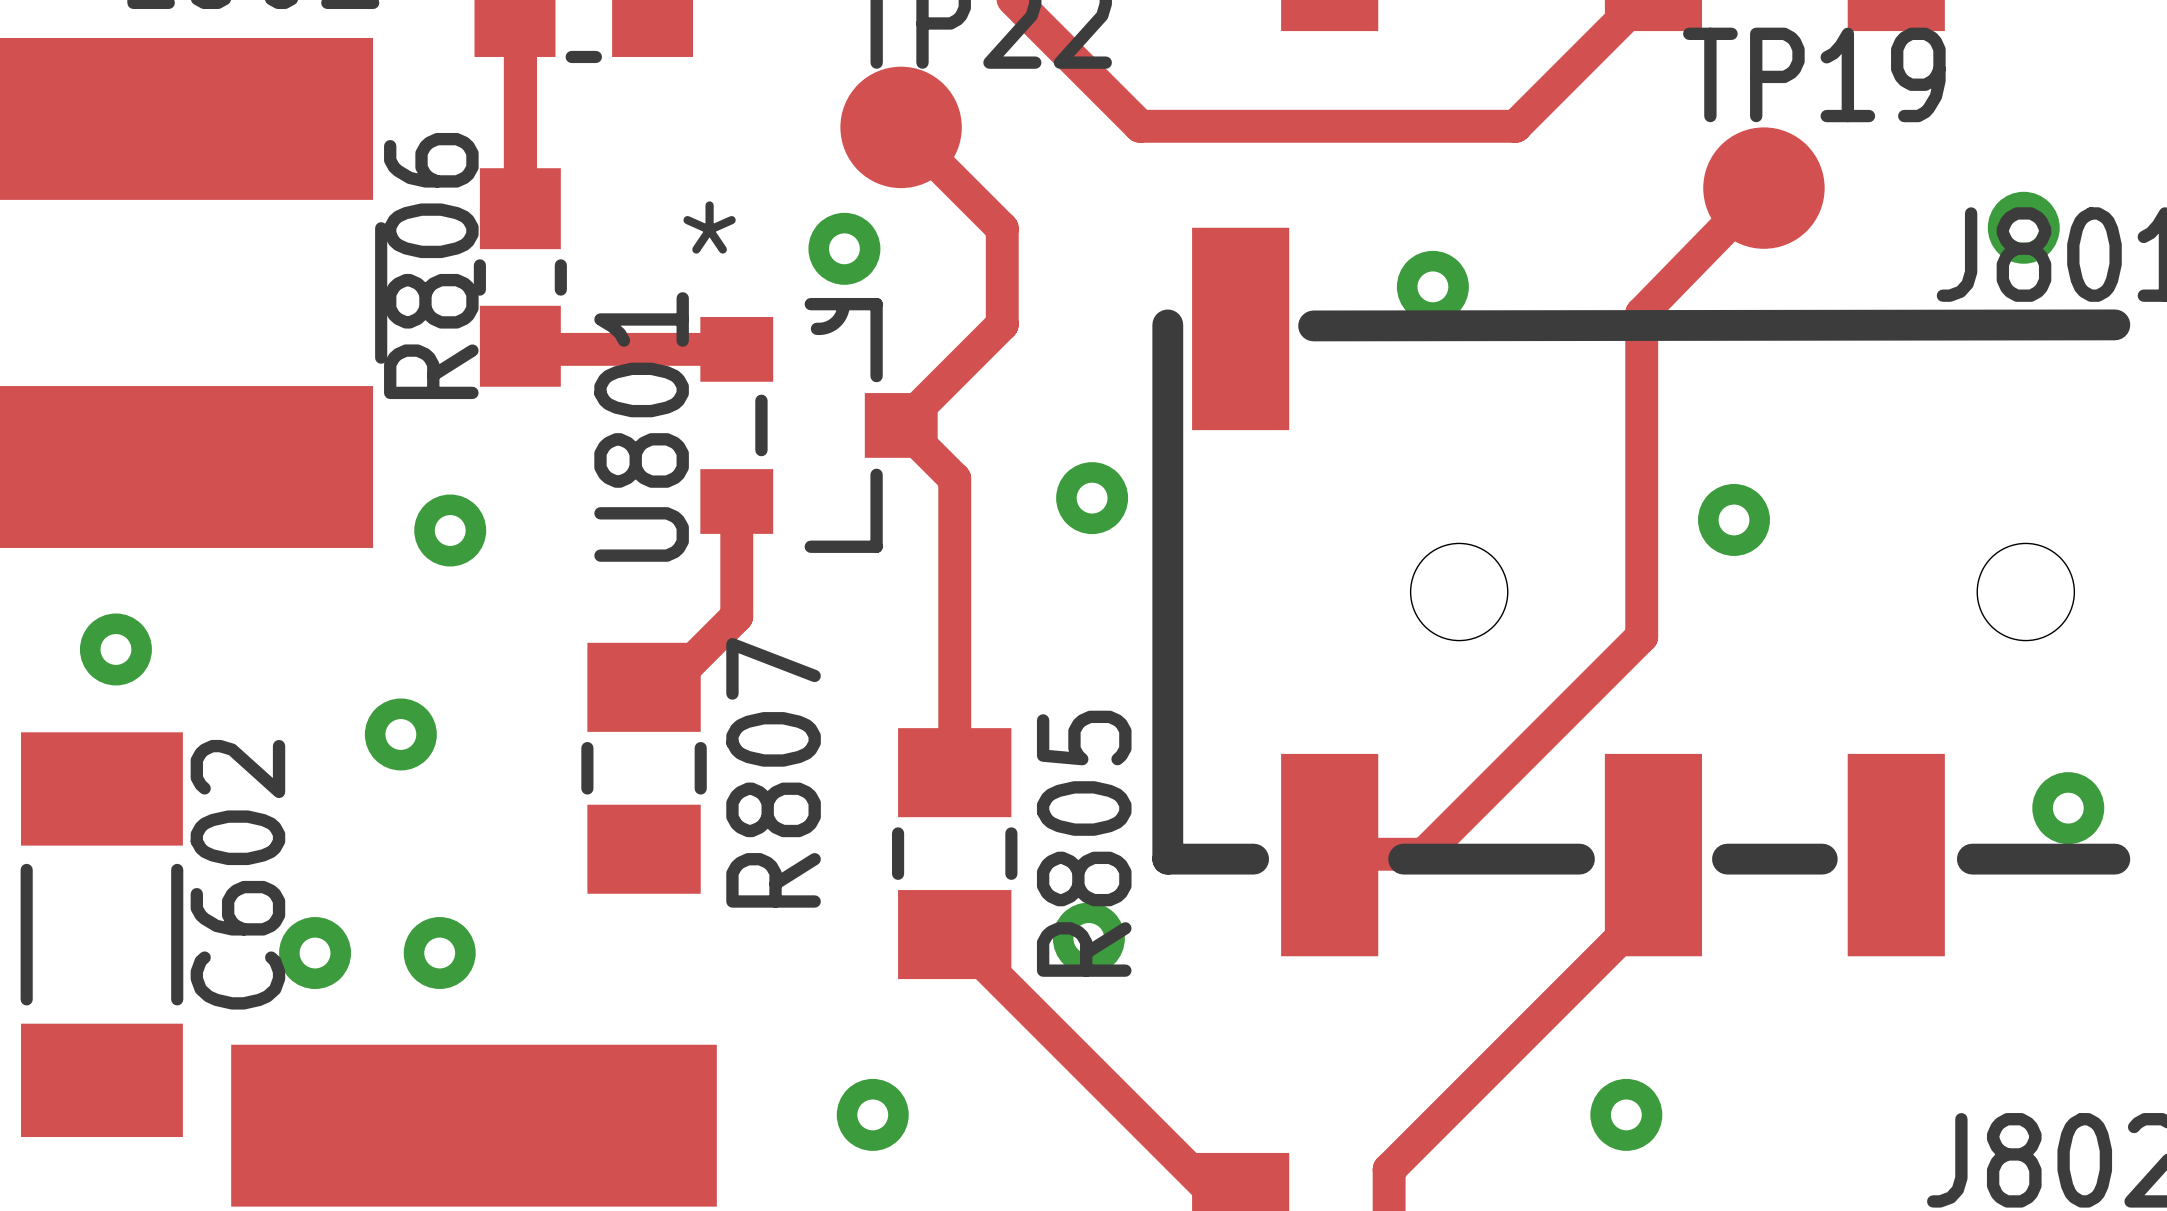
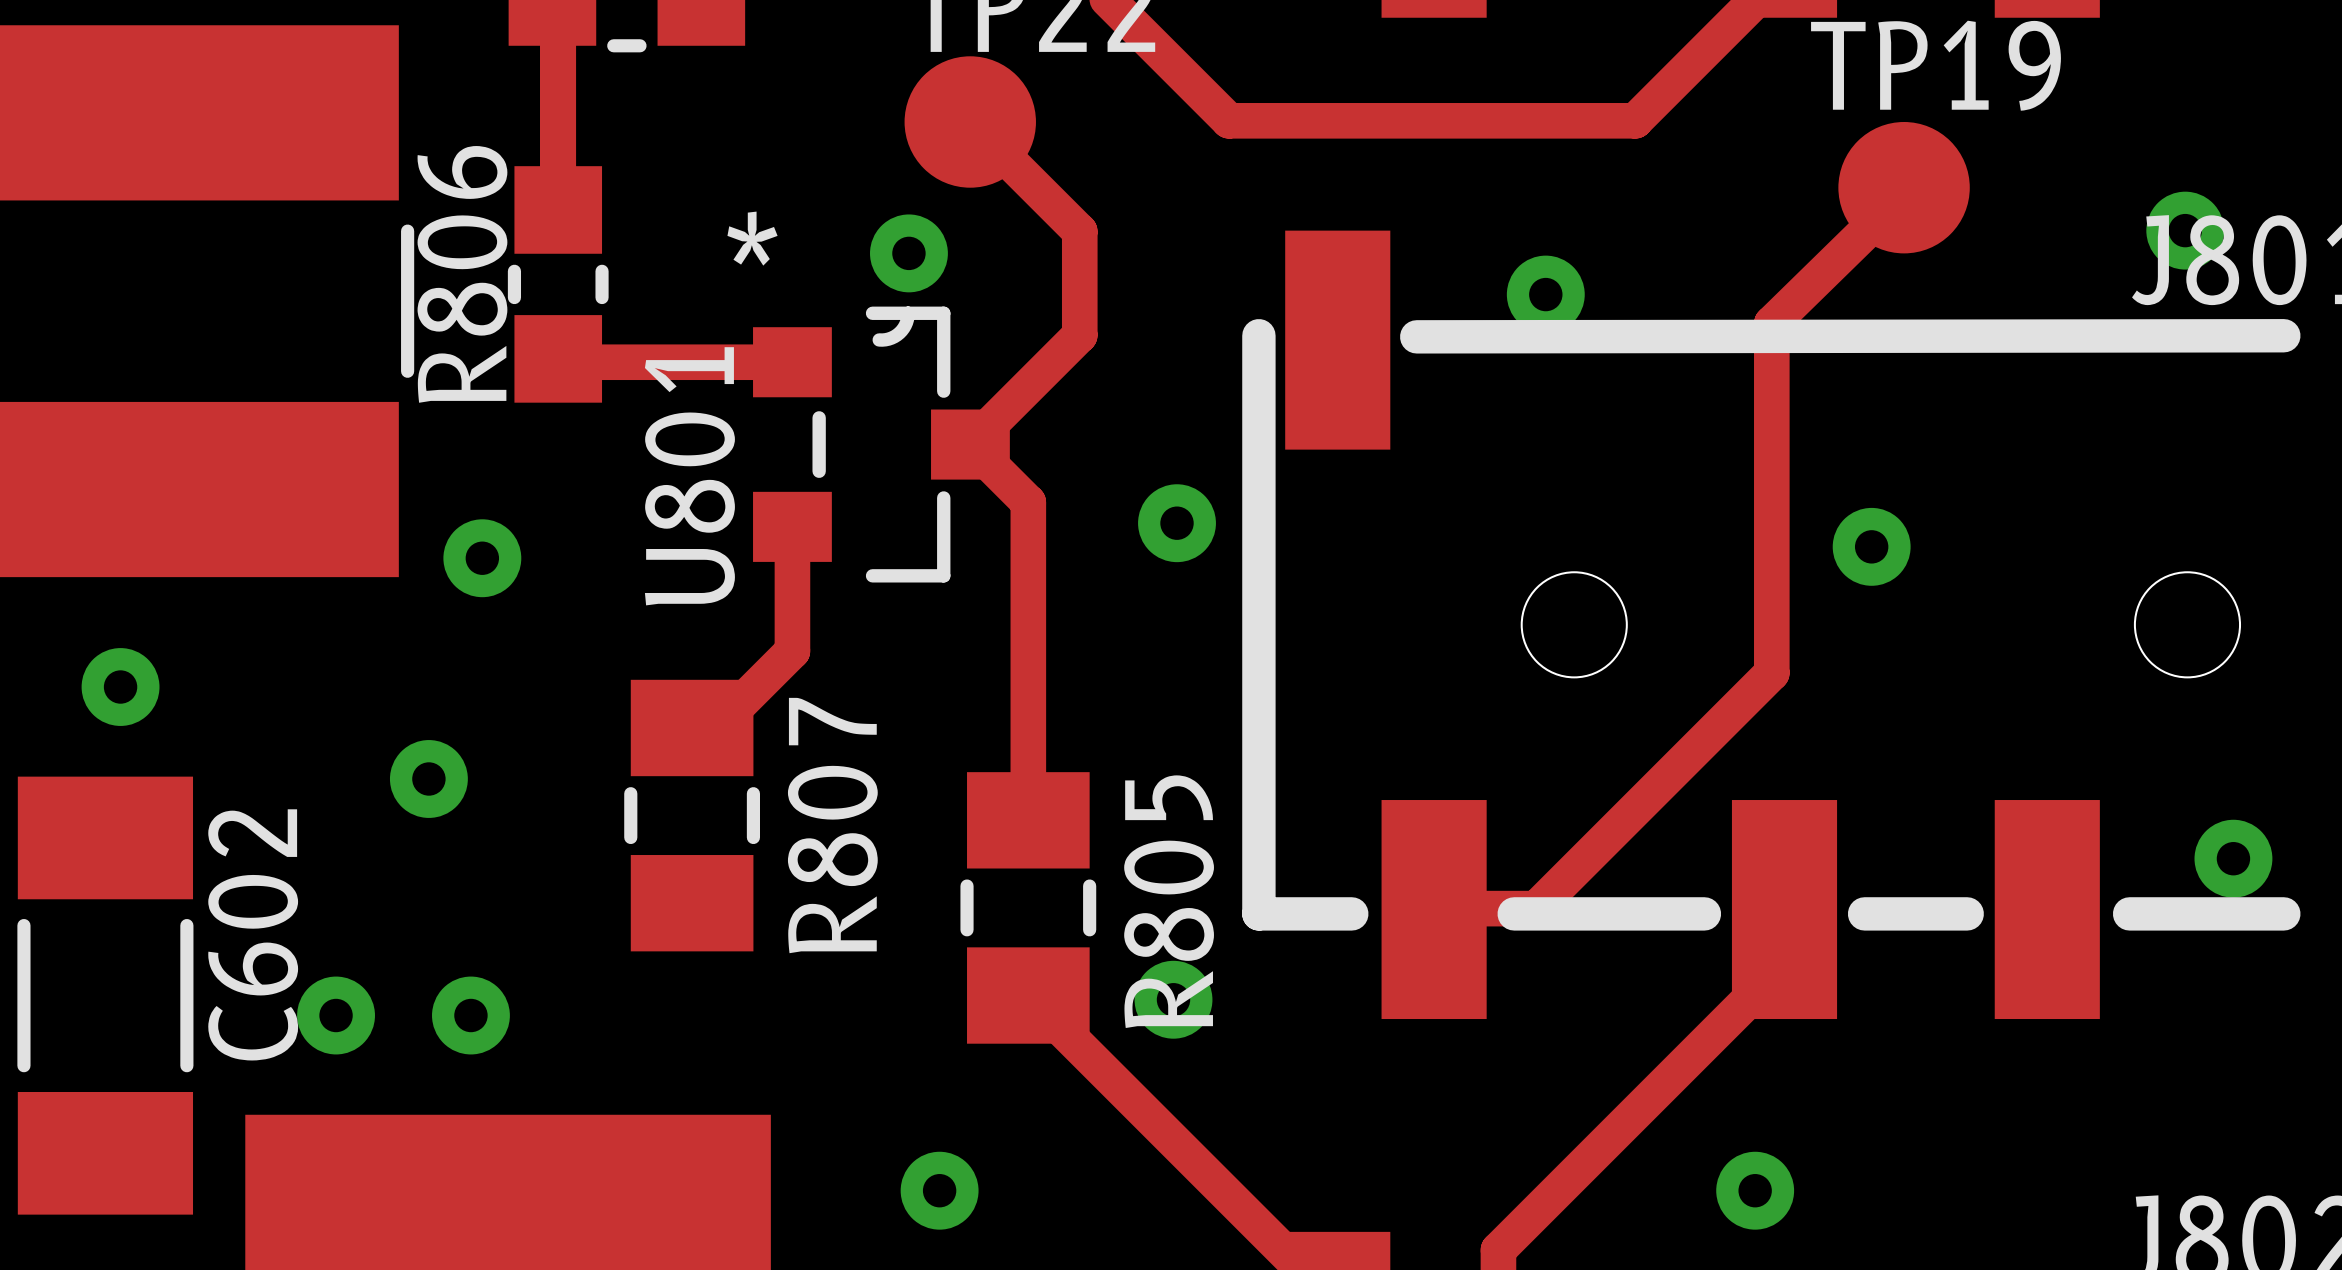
track: (1763, 188) (1641, 313) -> (1892, 205) (1771, 323)

